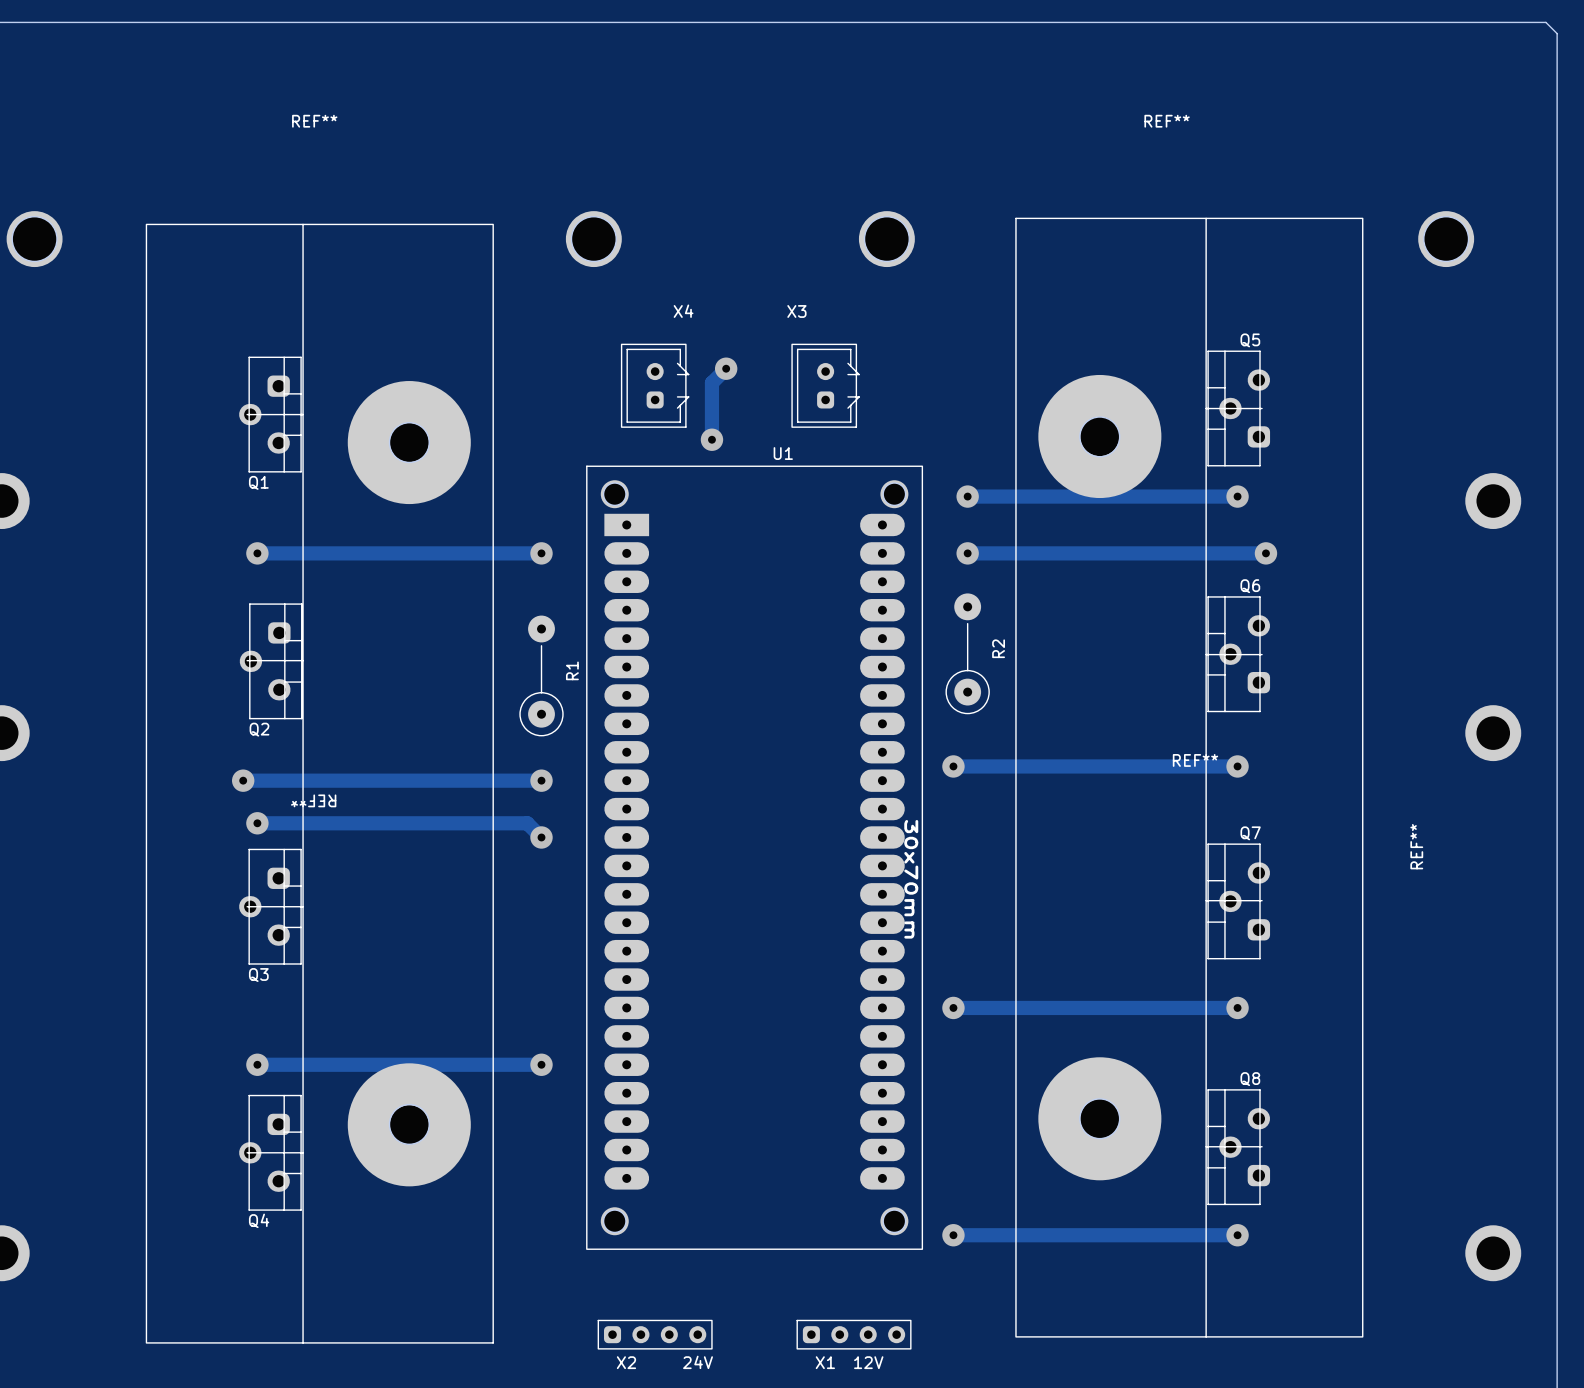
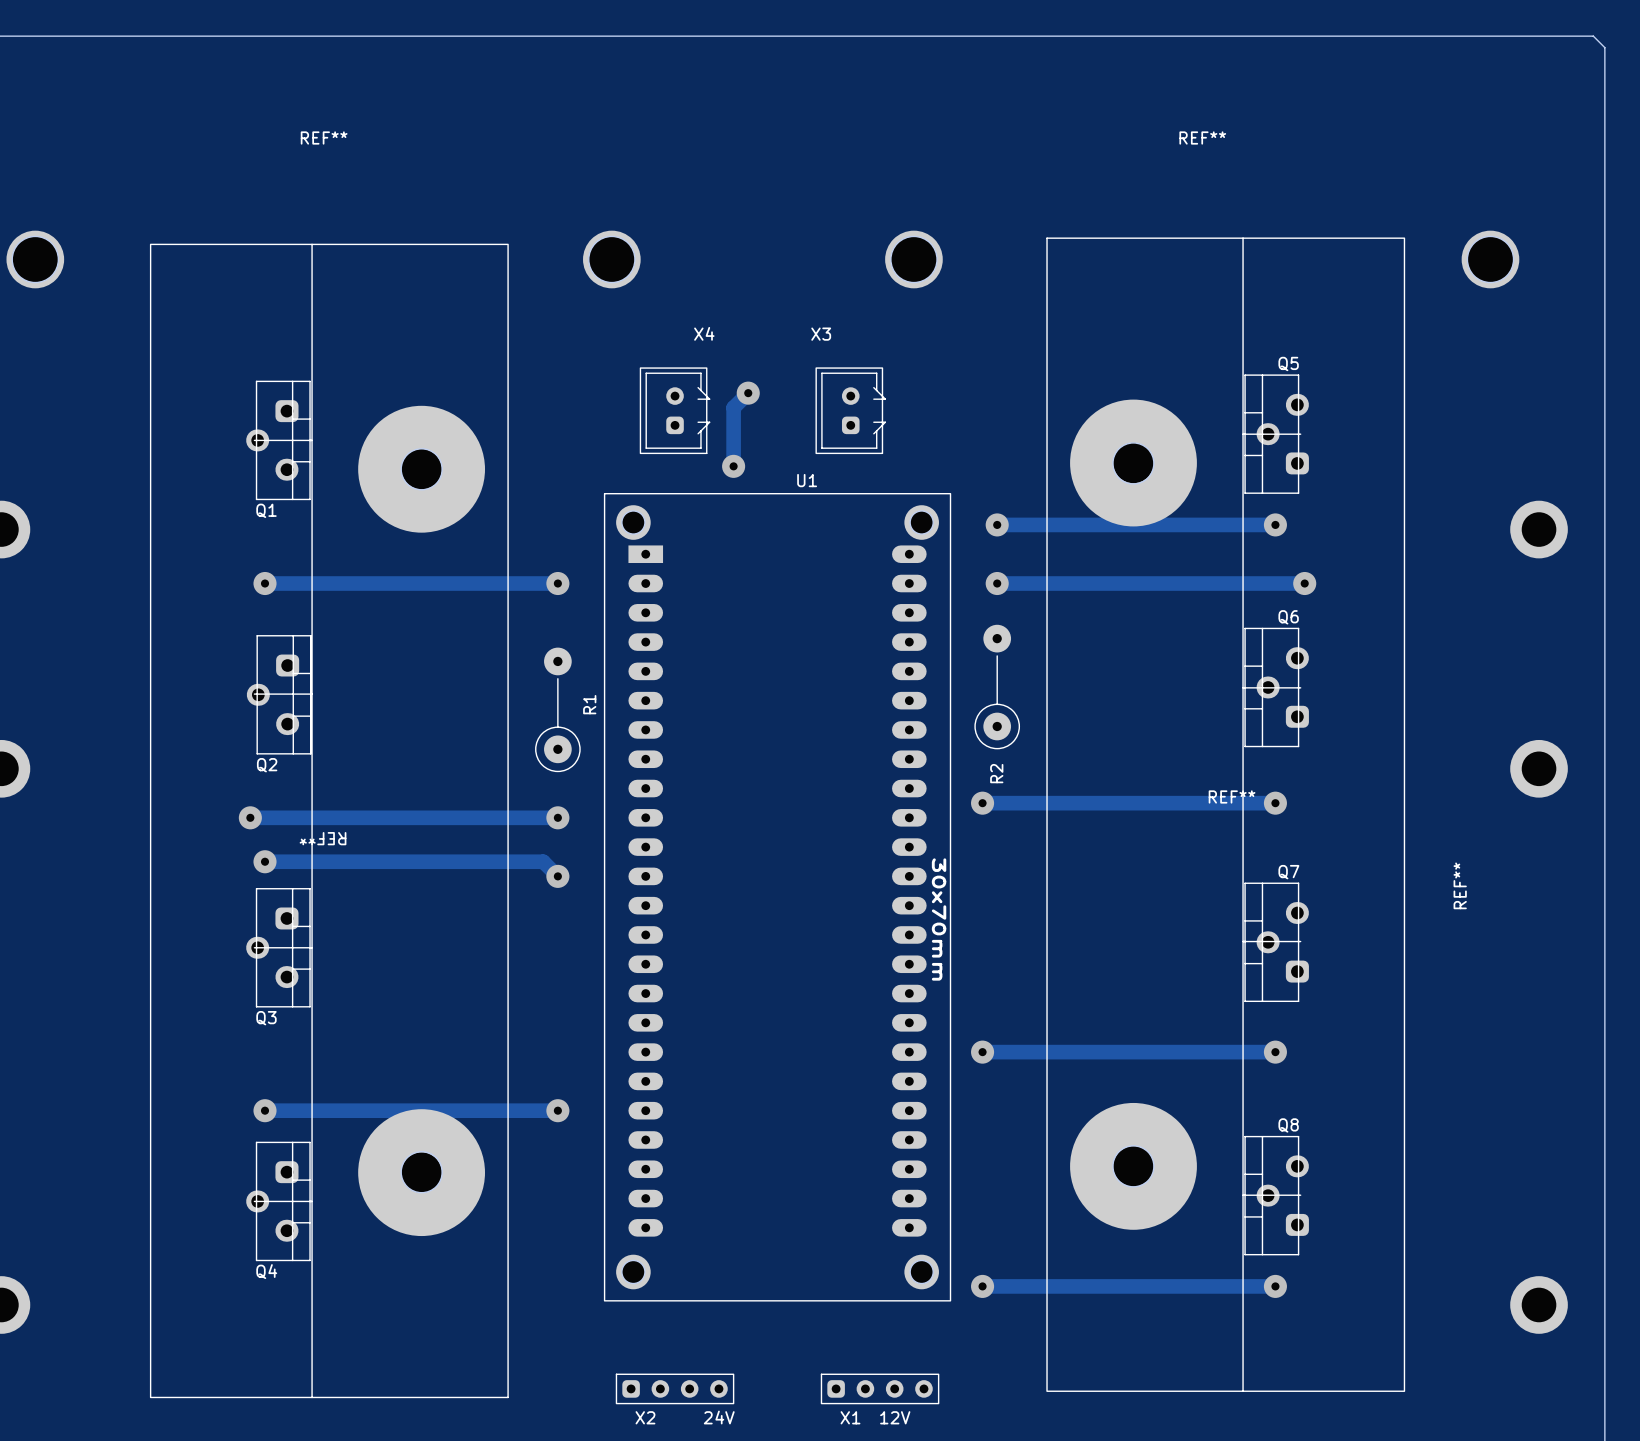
U1 footprint: [586, 465, 924, 1250] -> [603, 492, 952, 1302]
R2 name position: R2 (998, 648) -> R2 (996, 773)

